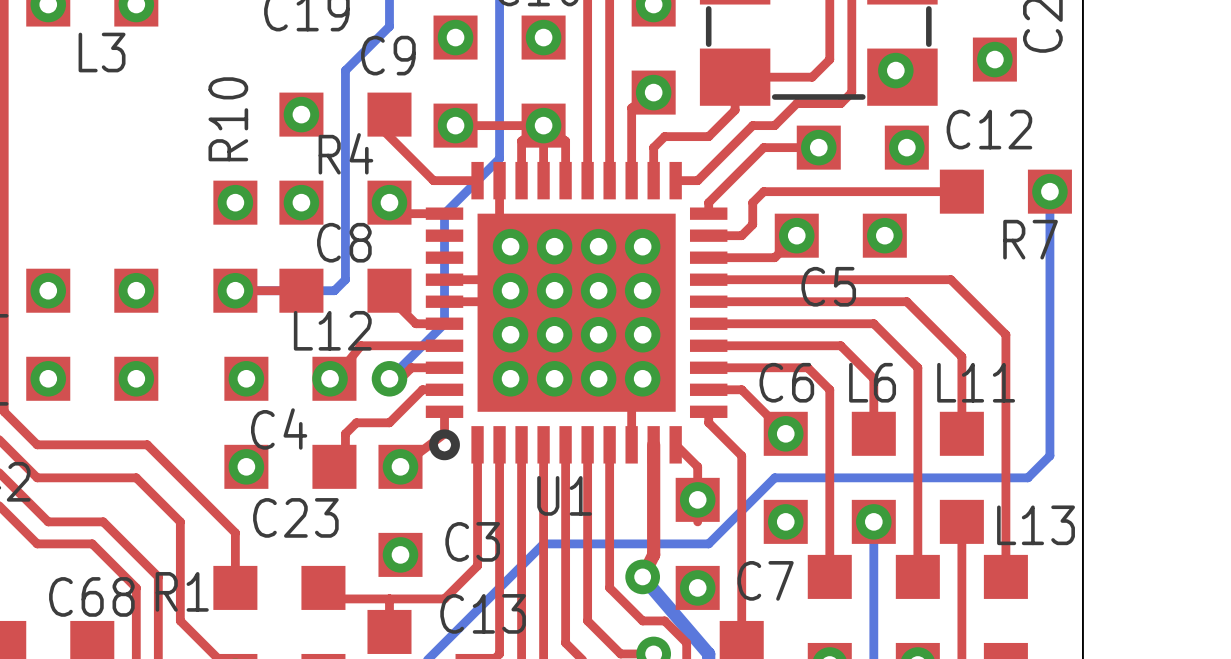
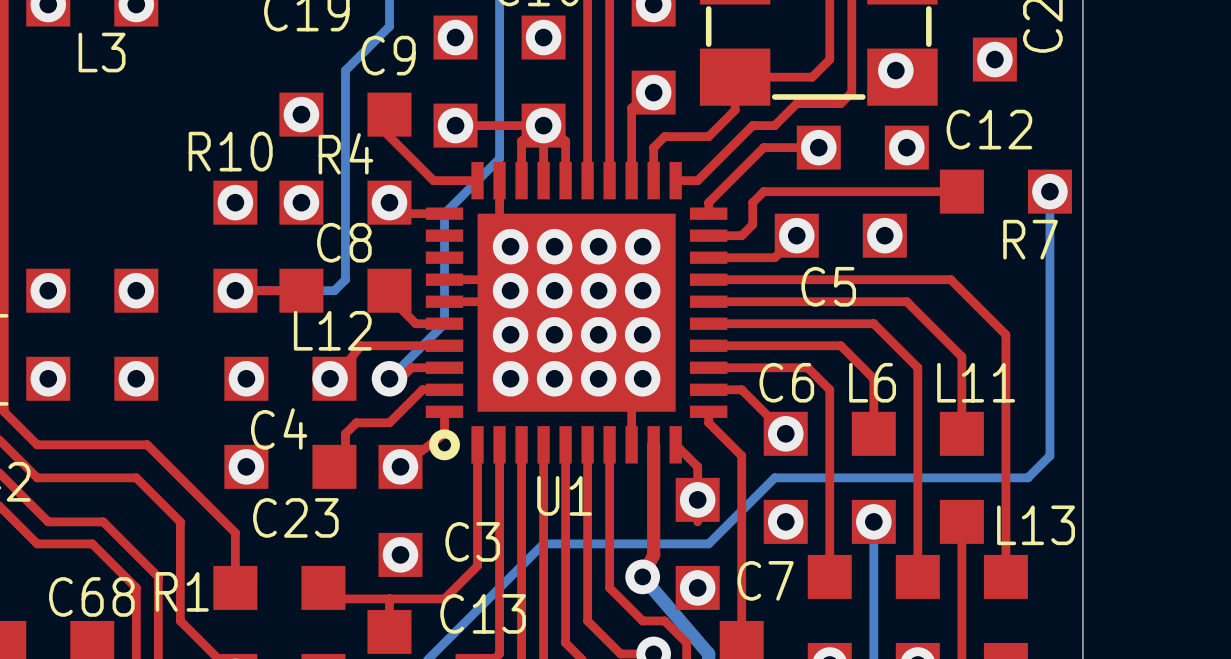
R10 name rotation: 0° (228, 119) -> 90° clockwise (230, 151)

